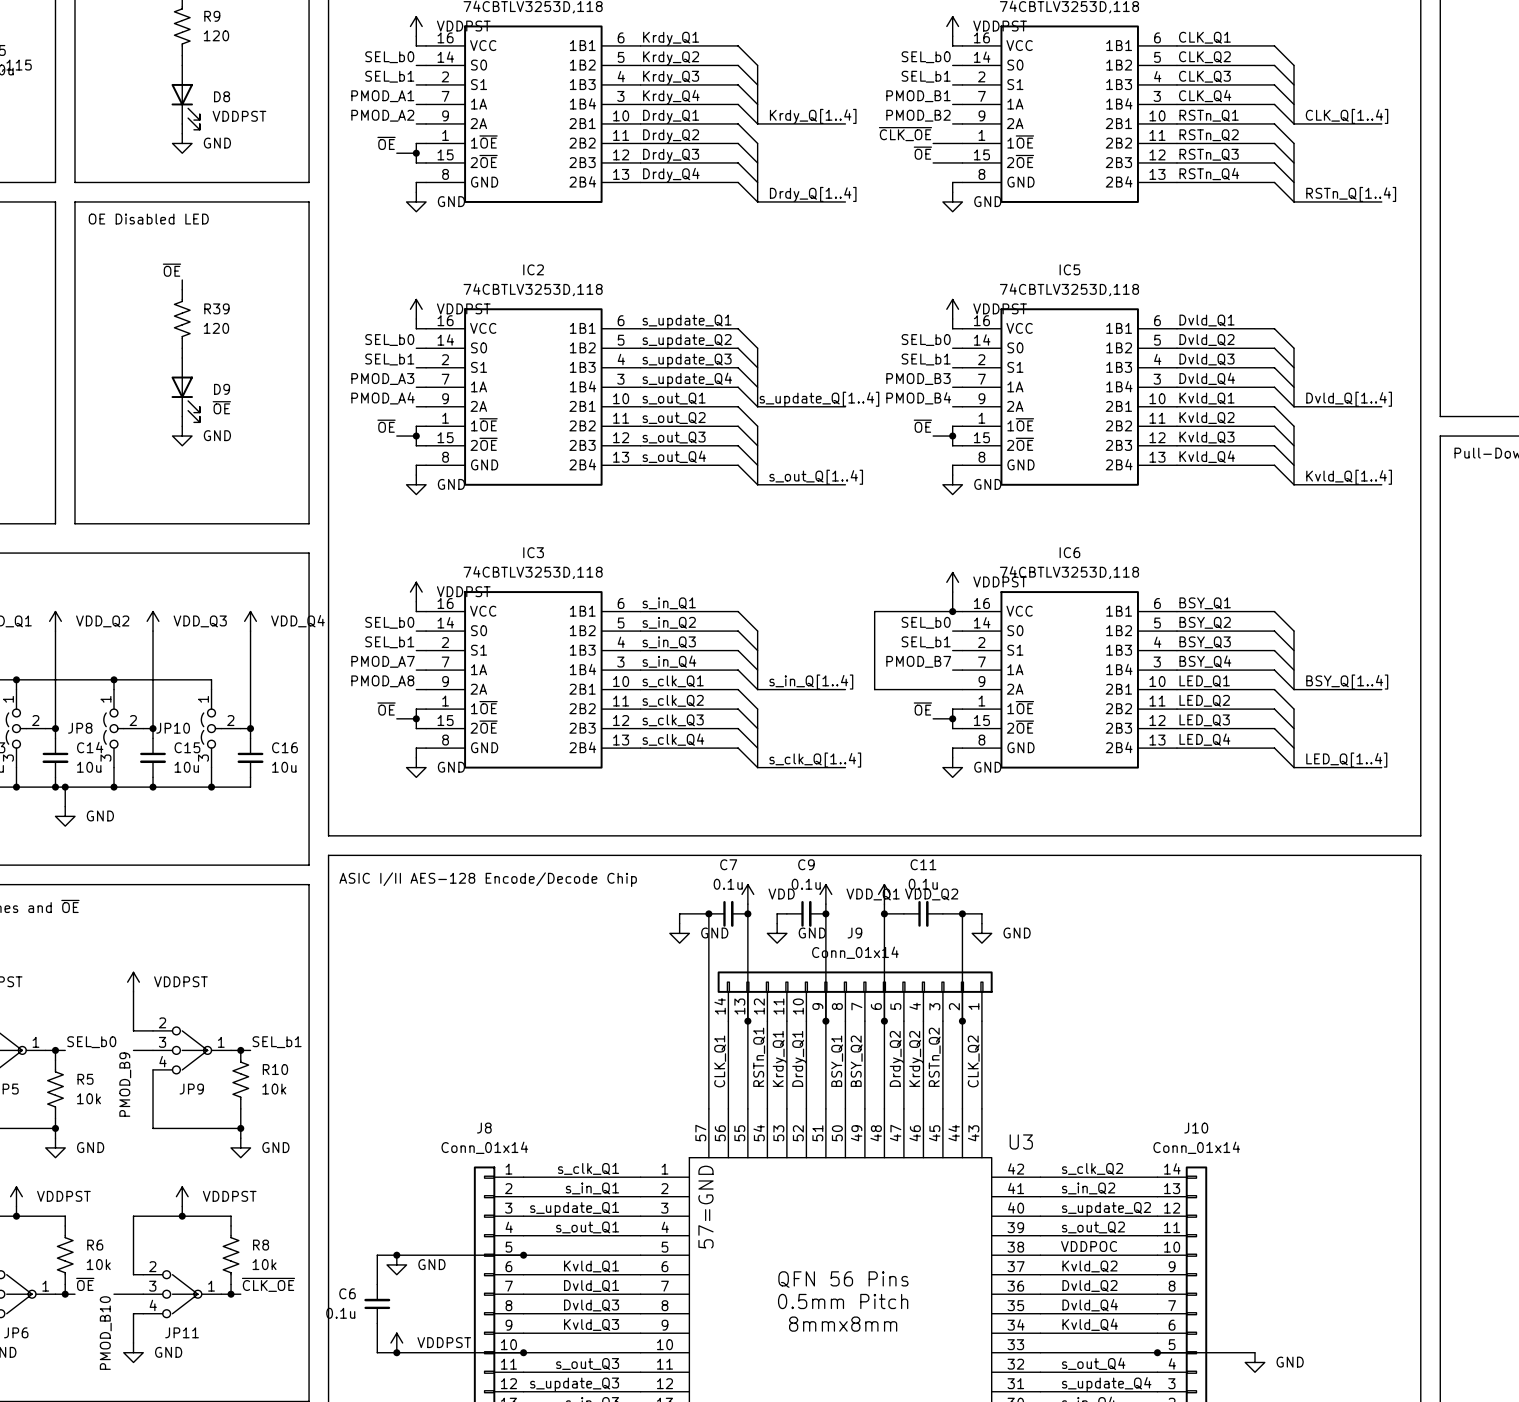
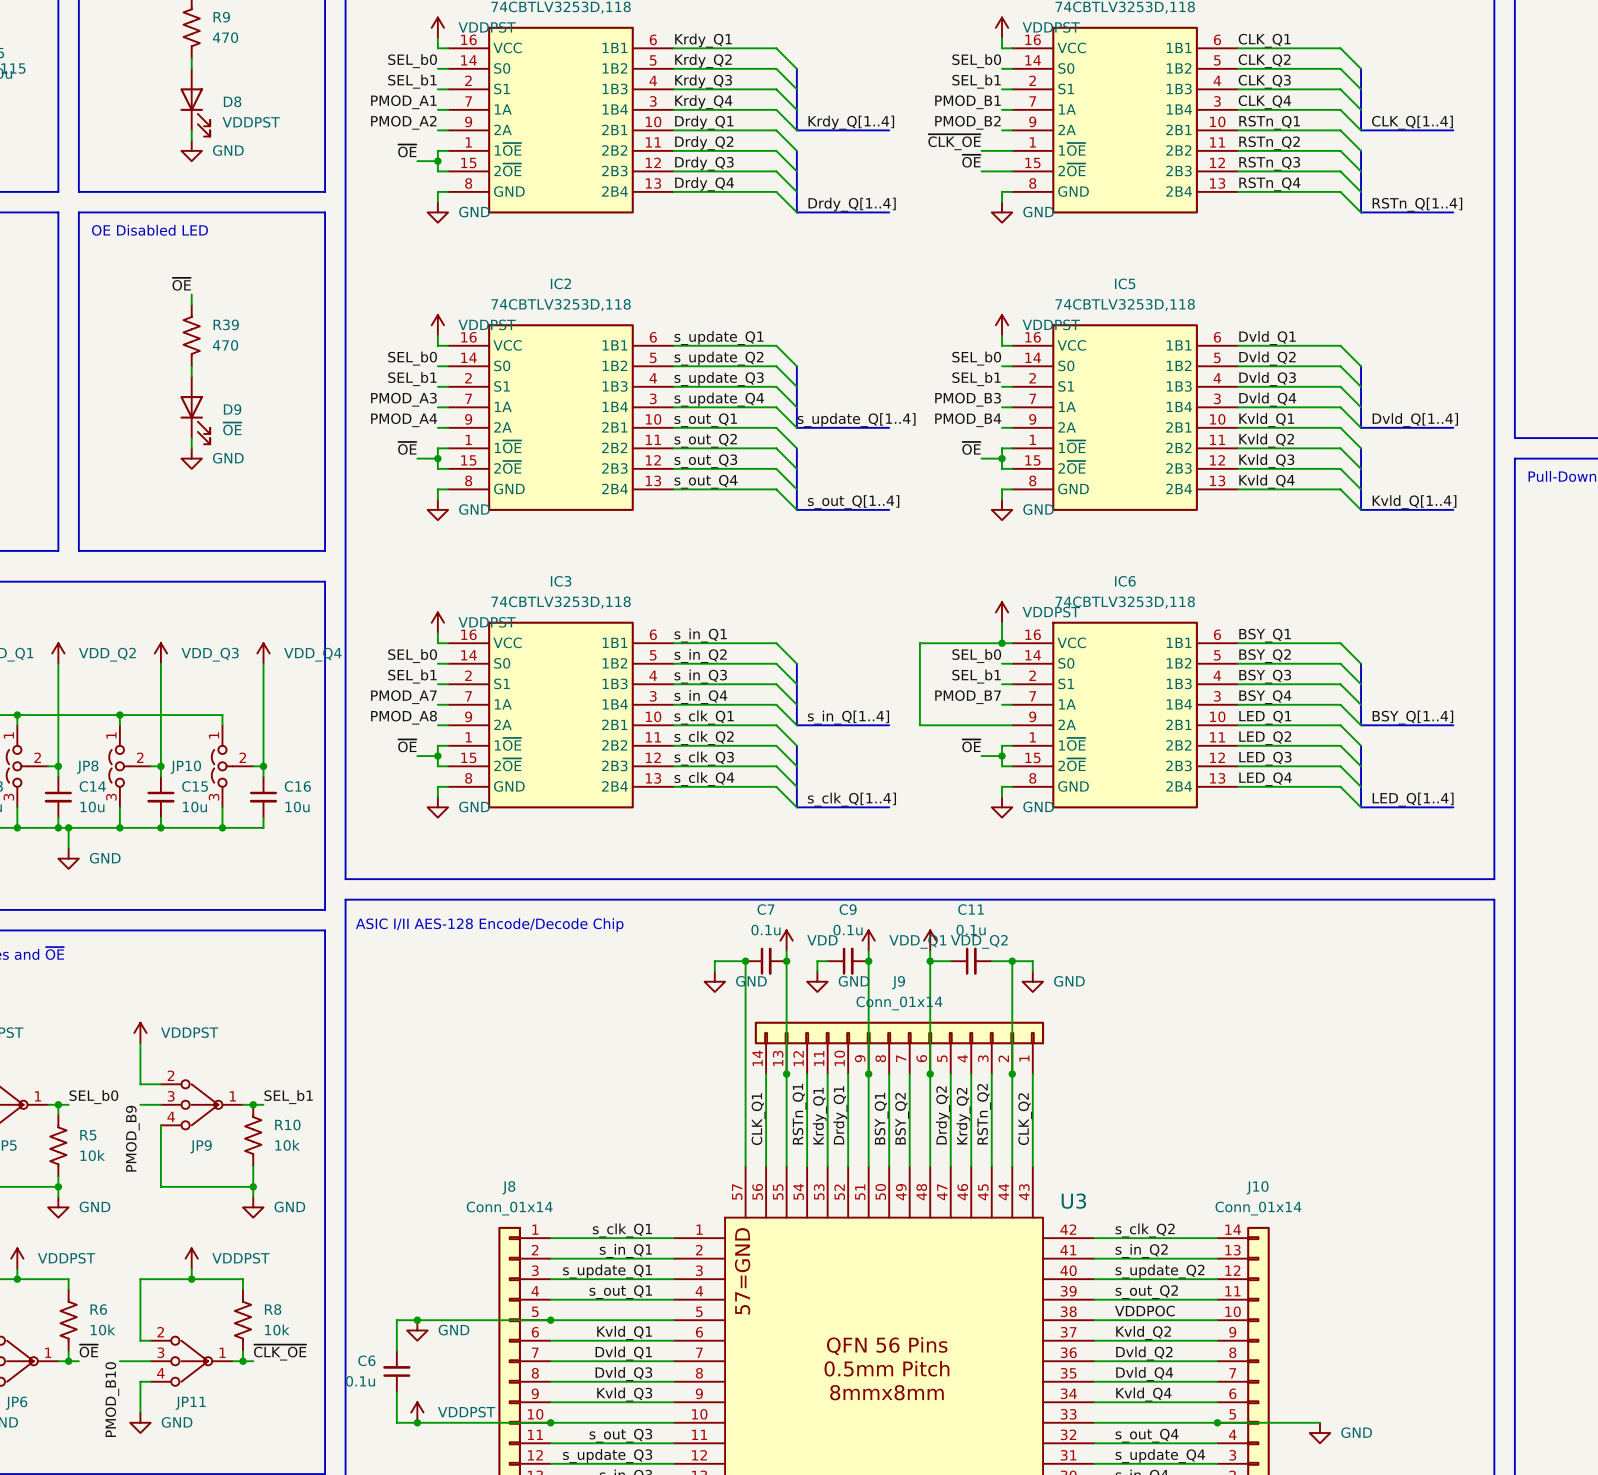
R9 value: 120 (216, 35) -> 470 (225, 37)
R39 value: 120 (216, 328) -> 470 (225, 345)

